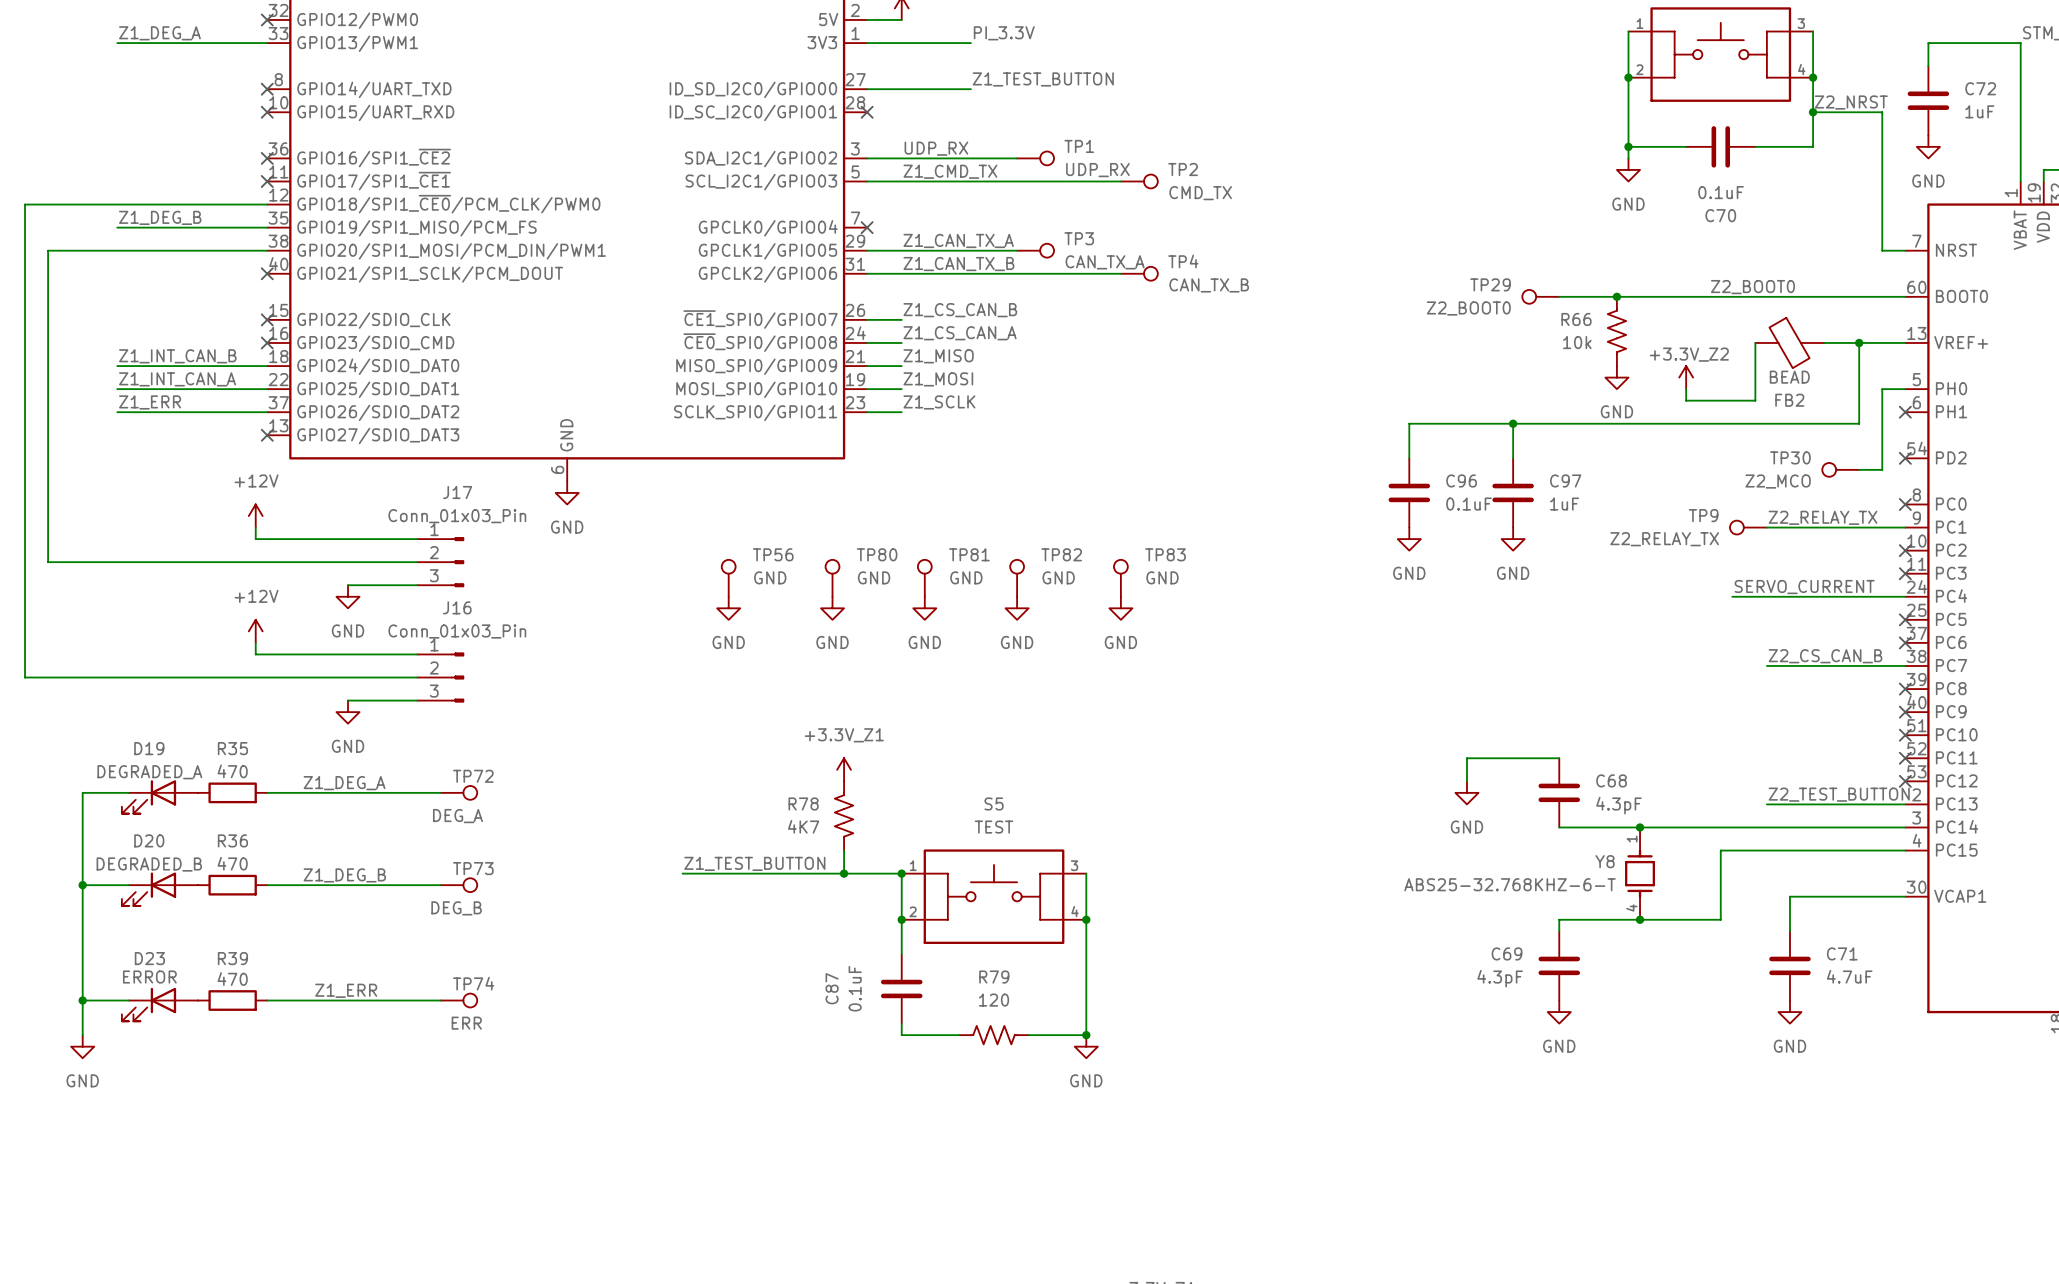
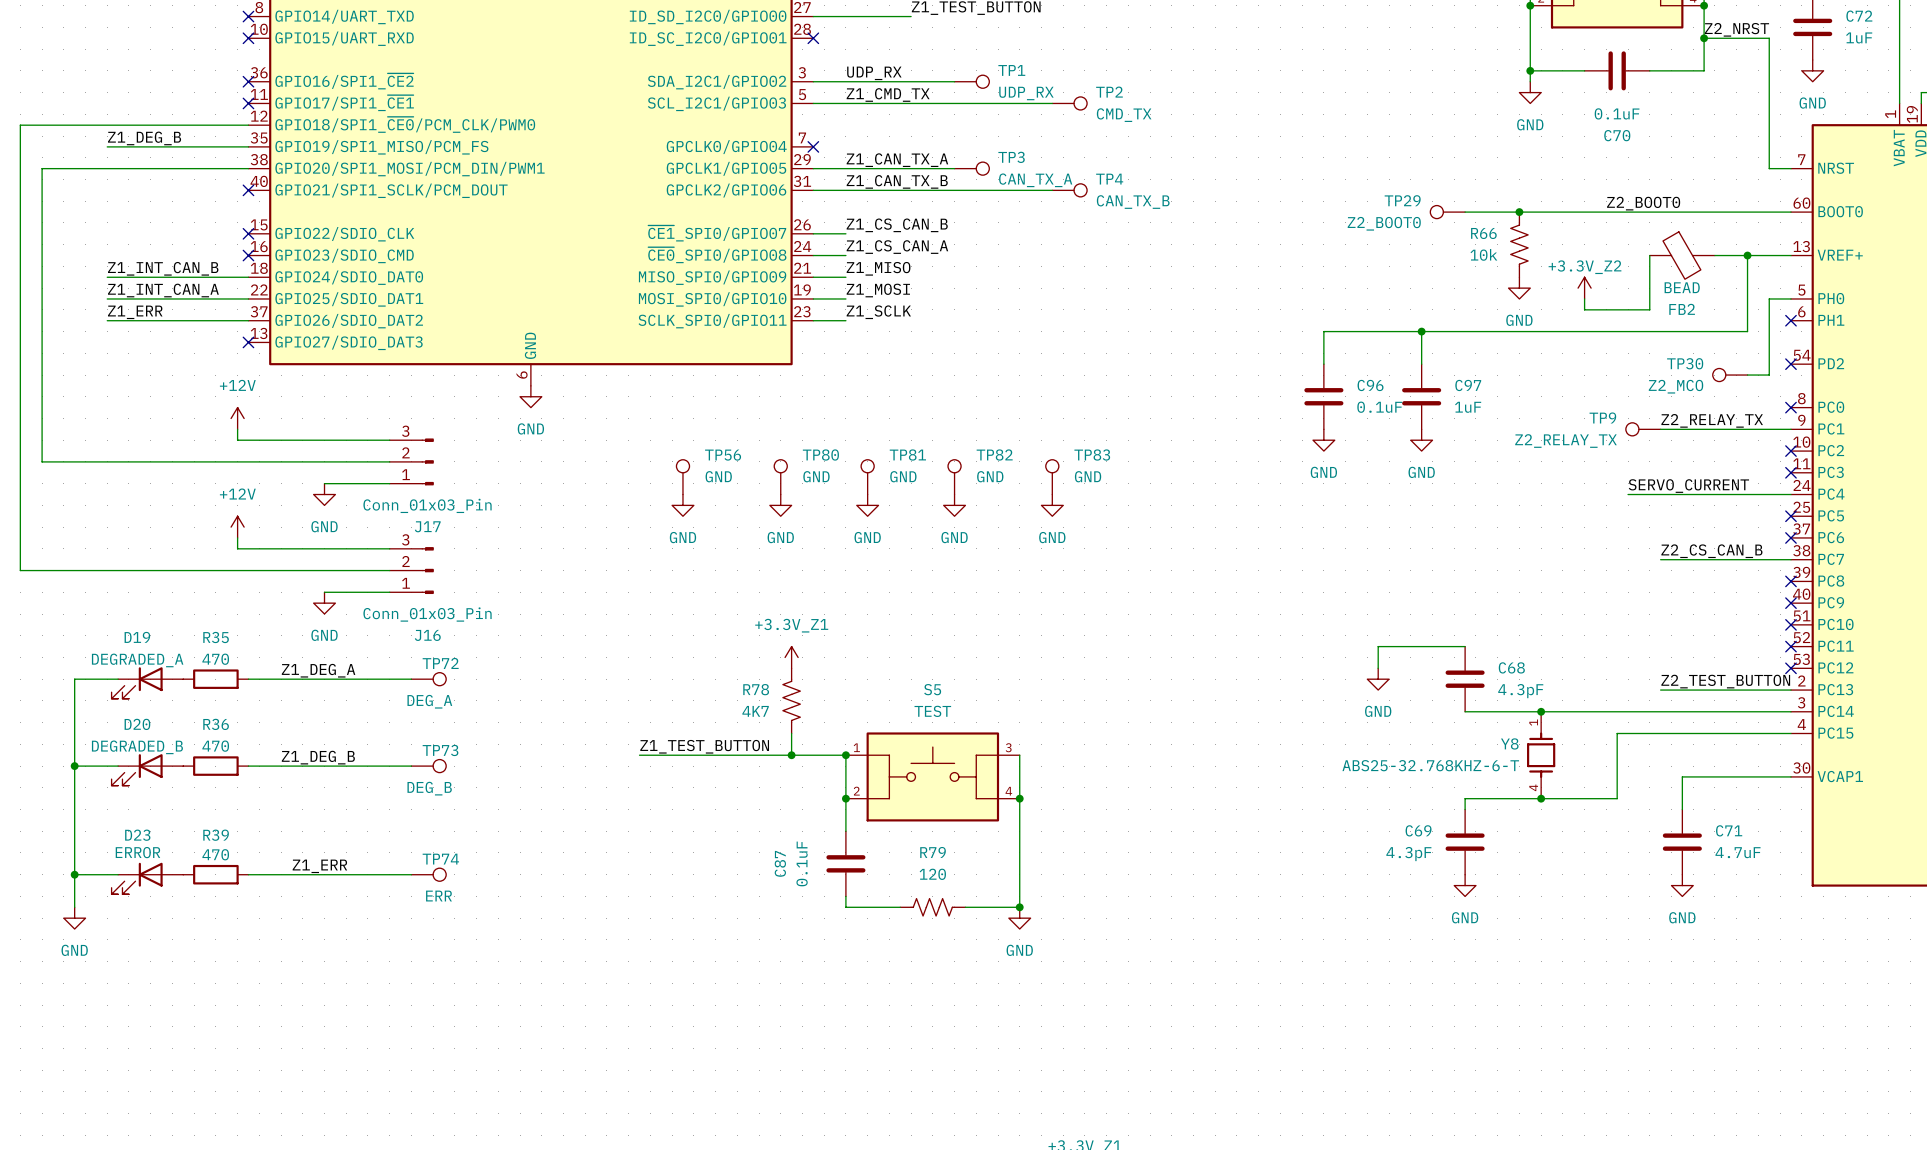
J17 flip: as is (457, 562) -> up-down (427, 461)
J16 flip: as is (457, 677) -> up-down (427, 570)

